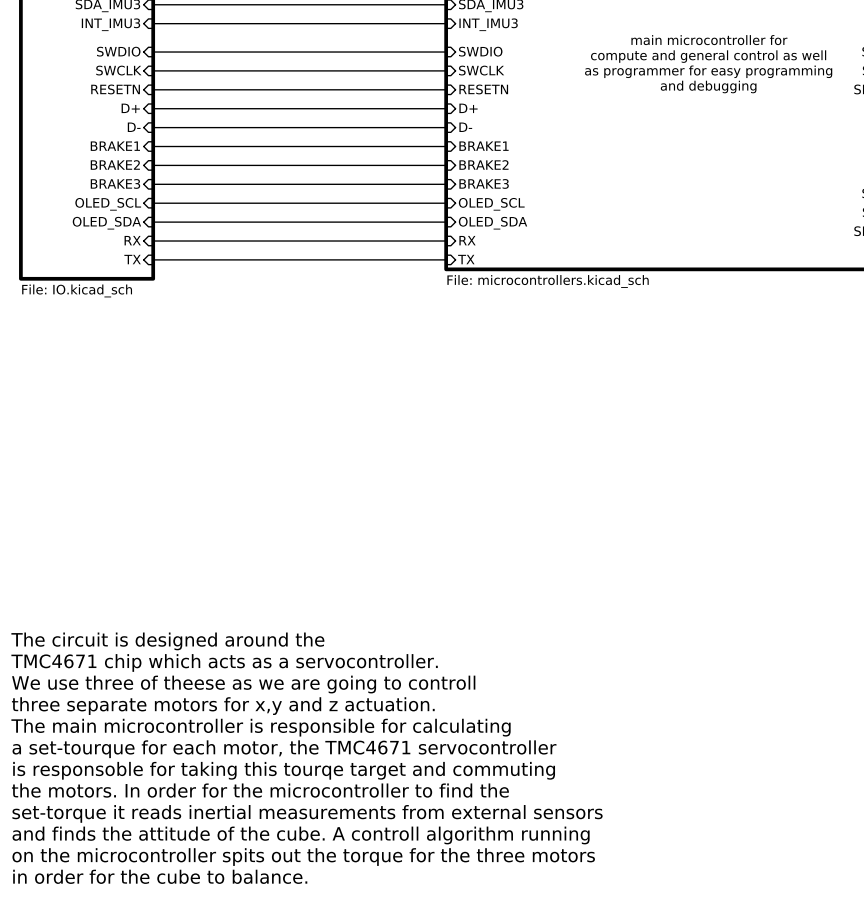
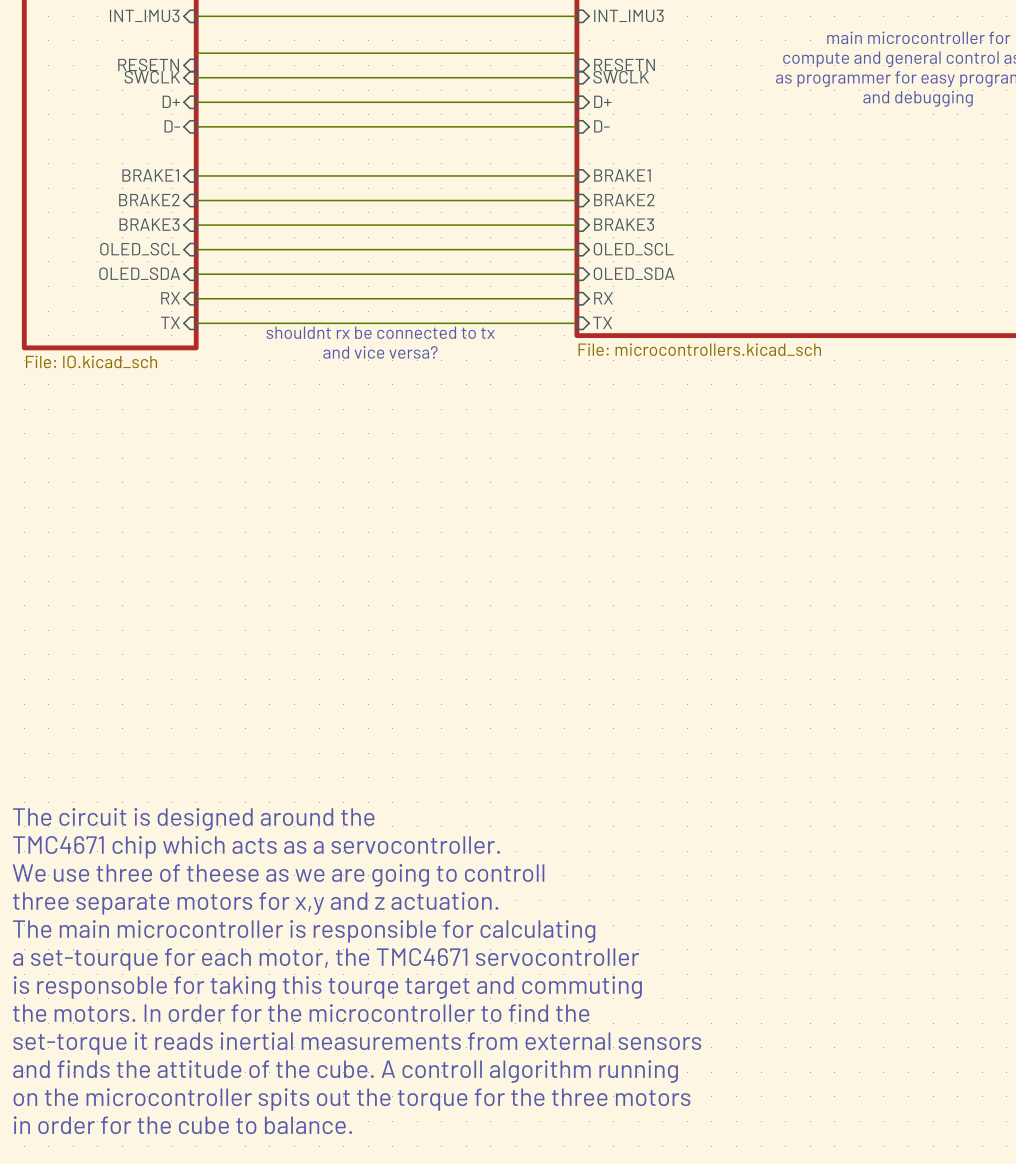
sheet pin: SWDIO (118, 51) -> none
sheet pin: SWDIO (480, 51) -> none
sheet pin: none -> RESETN (148, 64)
sheet pin: none -> RESETN (624, 64)
sheet pin: RESETN (115, 89) -> D+ (171, 101)
sheet pin: RESETN (483, 89) -> D+ (602, 101)
sheet pin: D+ (130, 108) -> D- (172, 126)
sheet pin: D+ (468, 108) -> D- (601, 126)
sheet pin: D- (134, 127) -> none
wire: (153, 127) (446, 127) -> none
sheet pin: D- (465, 127) -> none
text: none -> shouldnt rx be connected to tx (380, 332)
text: none -> and vice versa? (380, 352)

